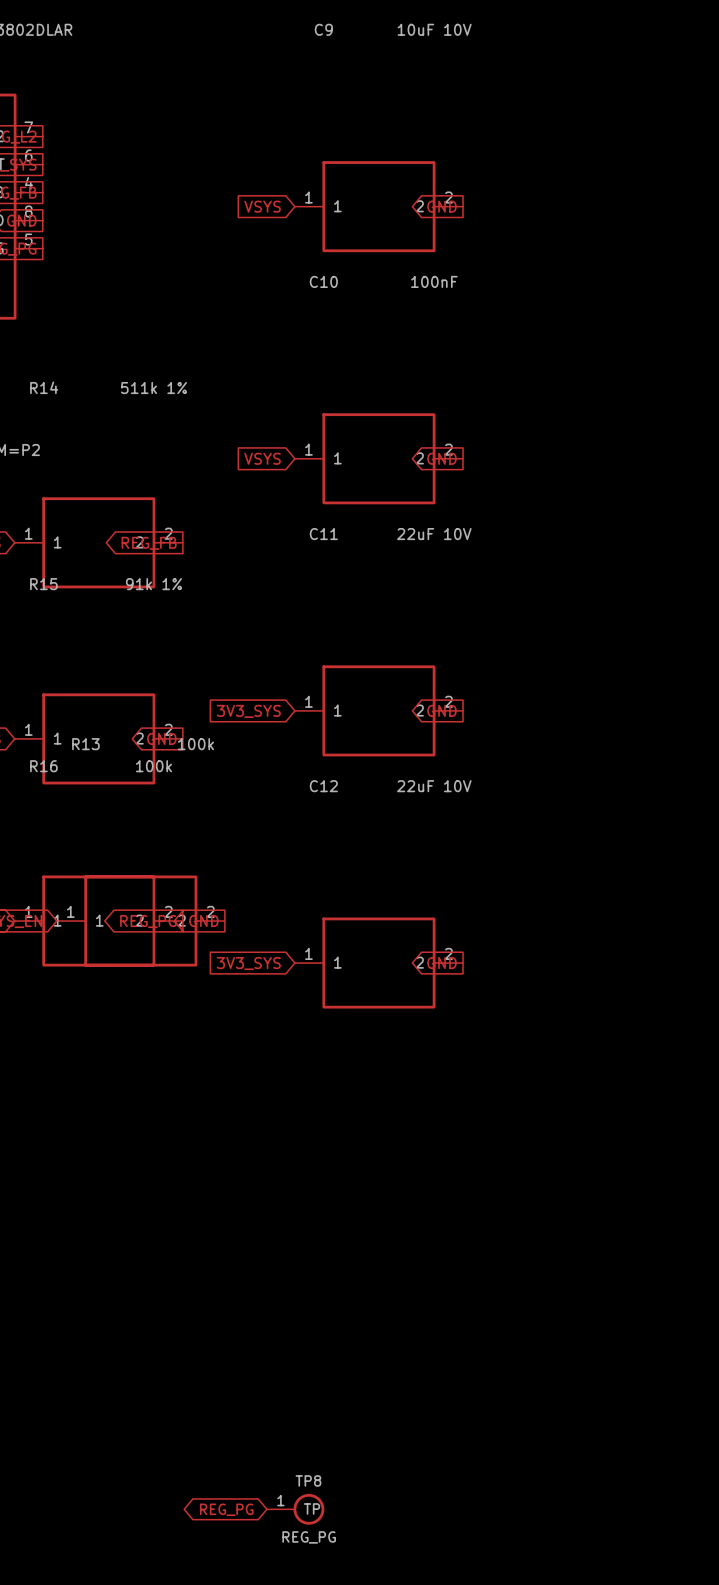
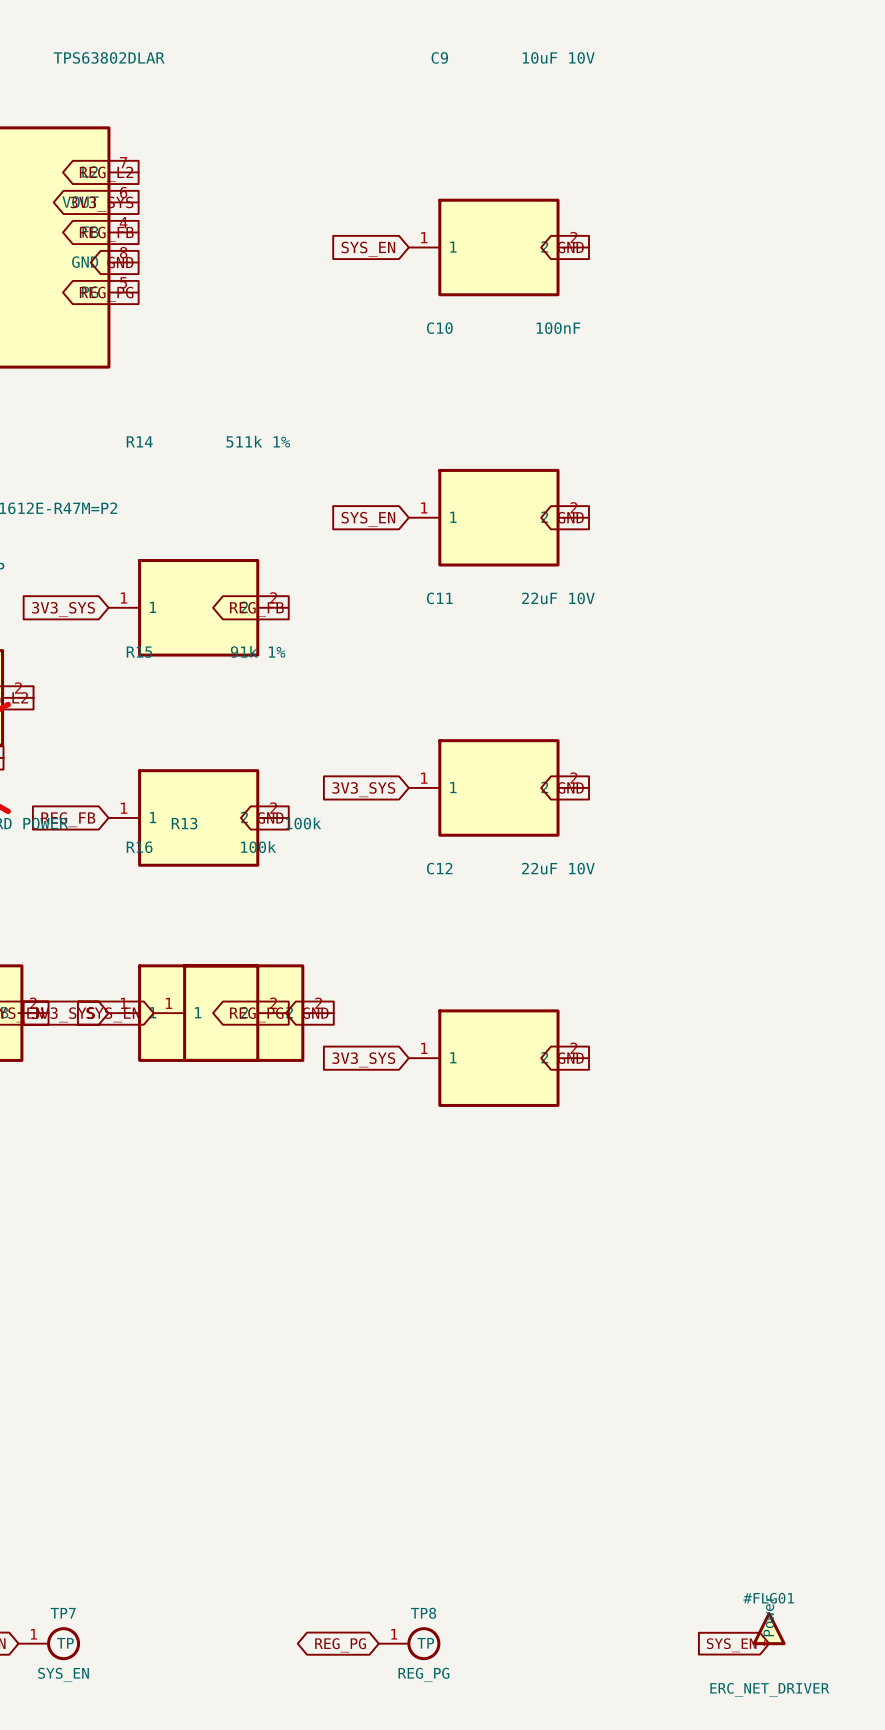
global label: VSYS (262, 206) -> SYS_EN (368, 249)
global label: VSYS (262, 458) -> SYS_EN (368, 519)
#FLG01: none -> ERC_NET_DRIVER (769, 1628)
global label: none -> SYS_EN (731, 1645)

